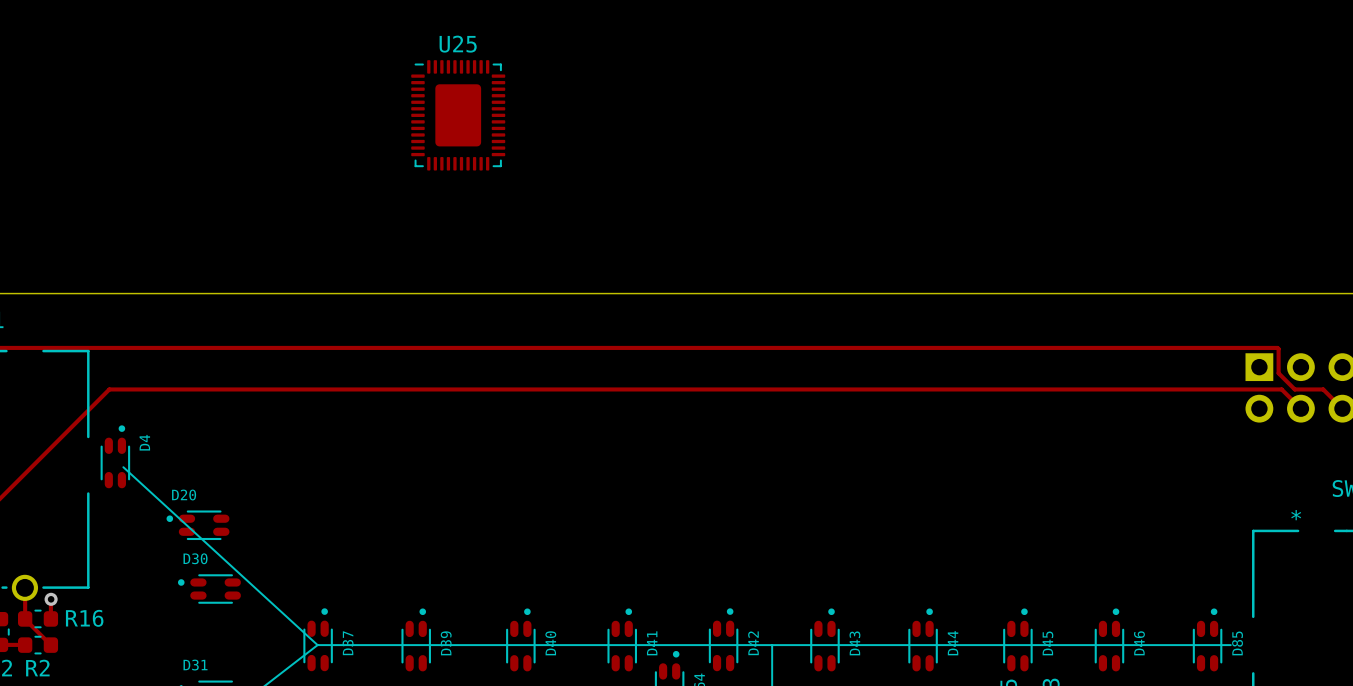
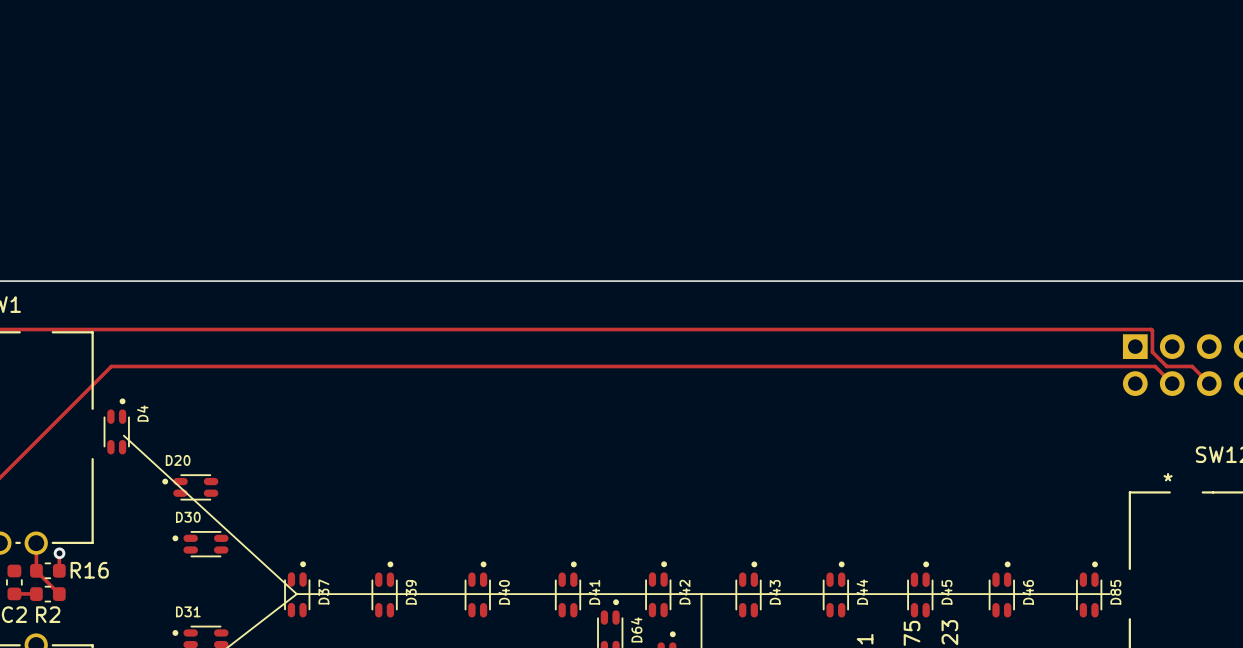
U25: (458, 115) -> none

